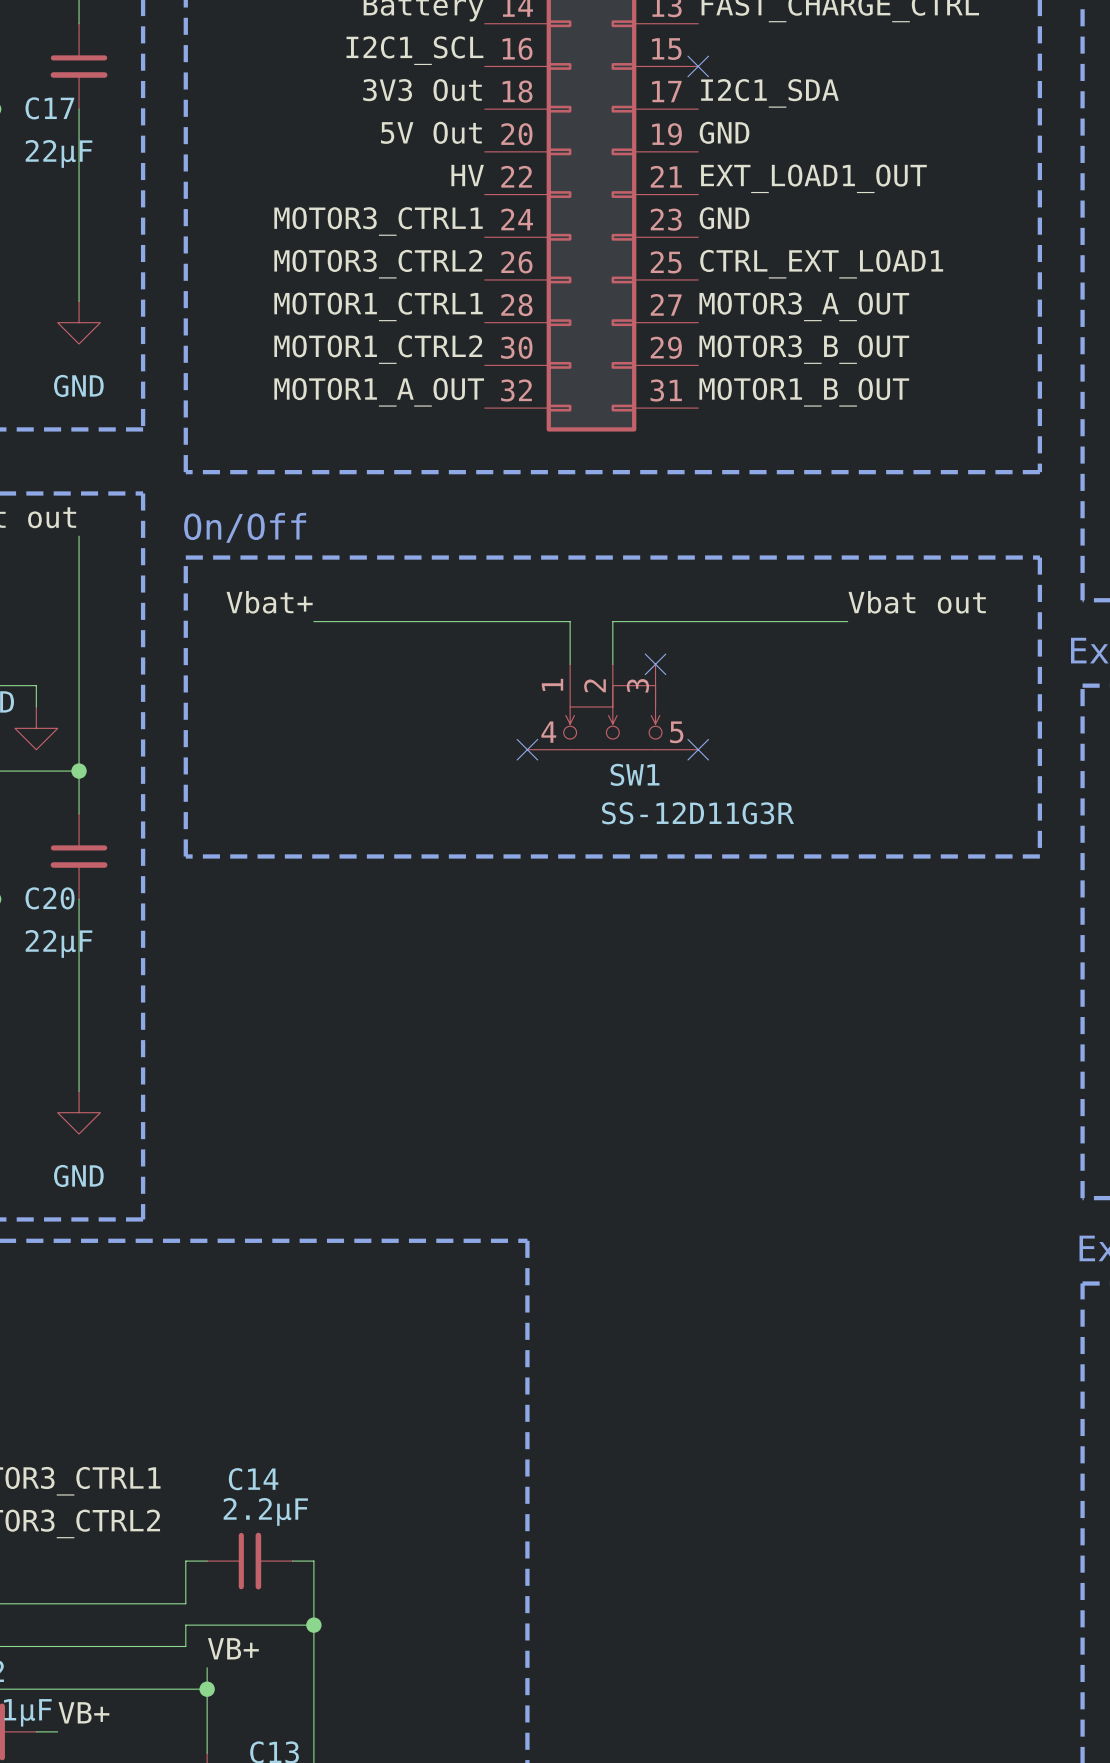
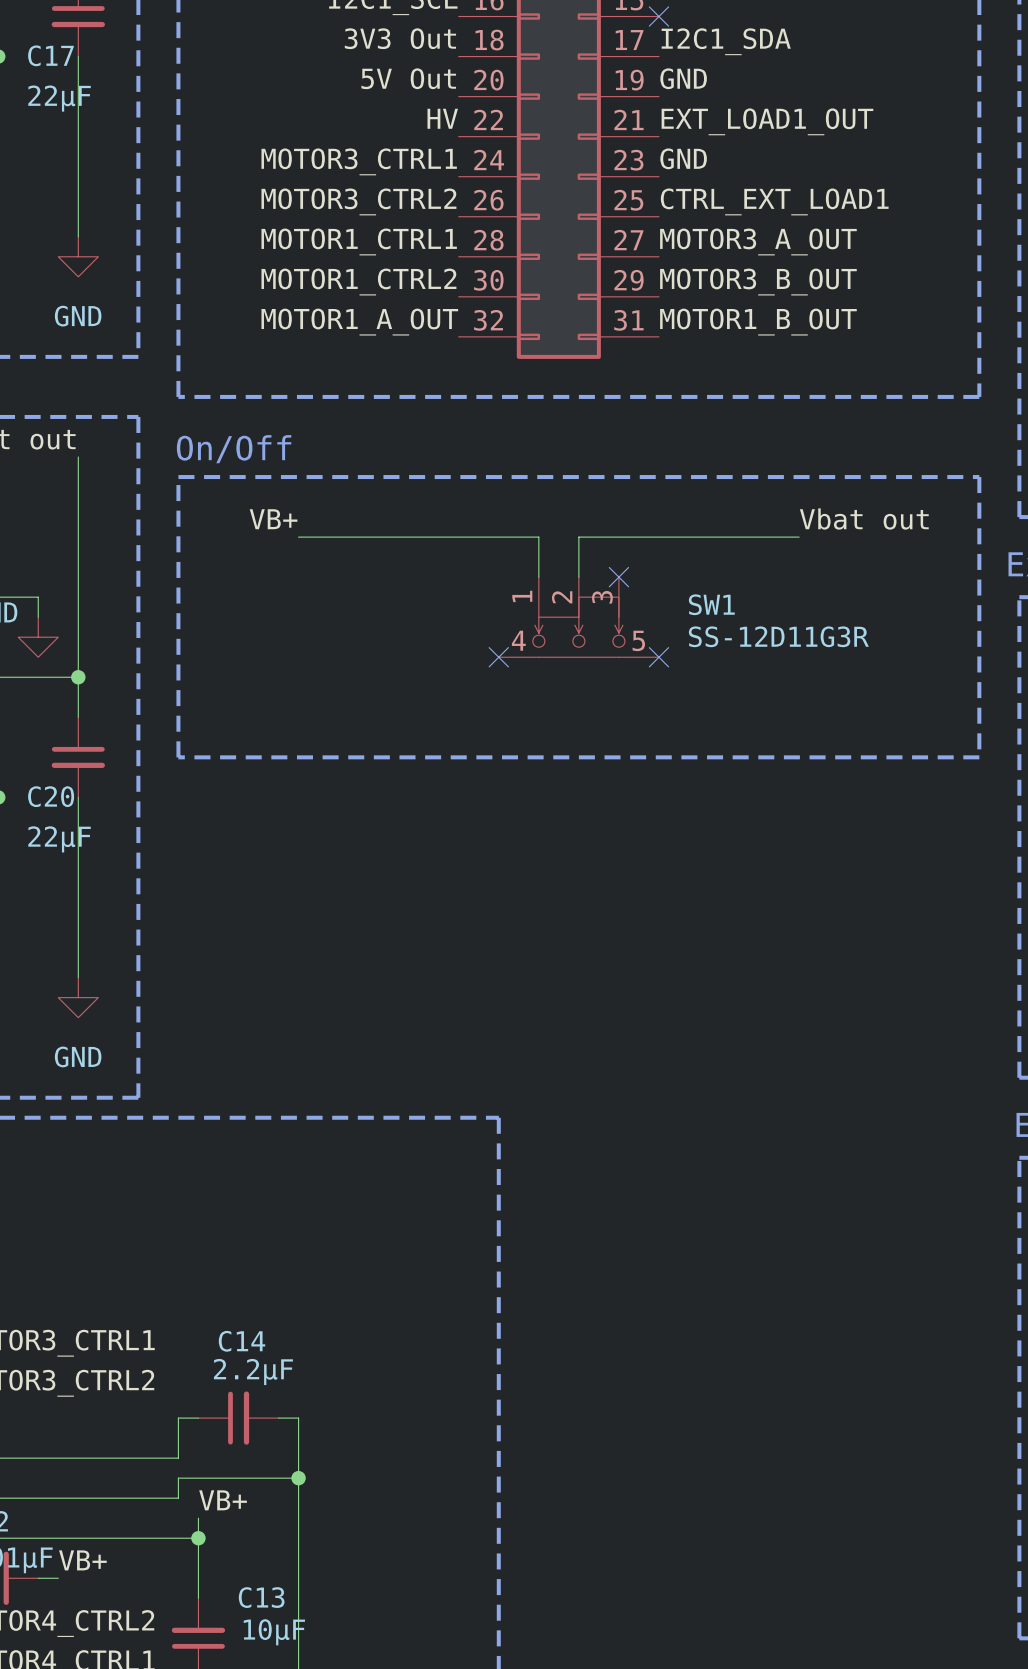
label: Vbat+ (269, 602) -> VB+ (273, 519)
SW1 name position: SW1 (635, 774) -> SW1 (711, 604)
SW1 value position: SS-12D11G3R (697, 813) -> SS-12D11G3R (778, 636)

